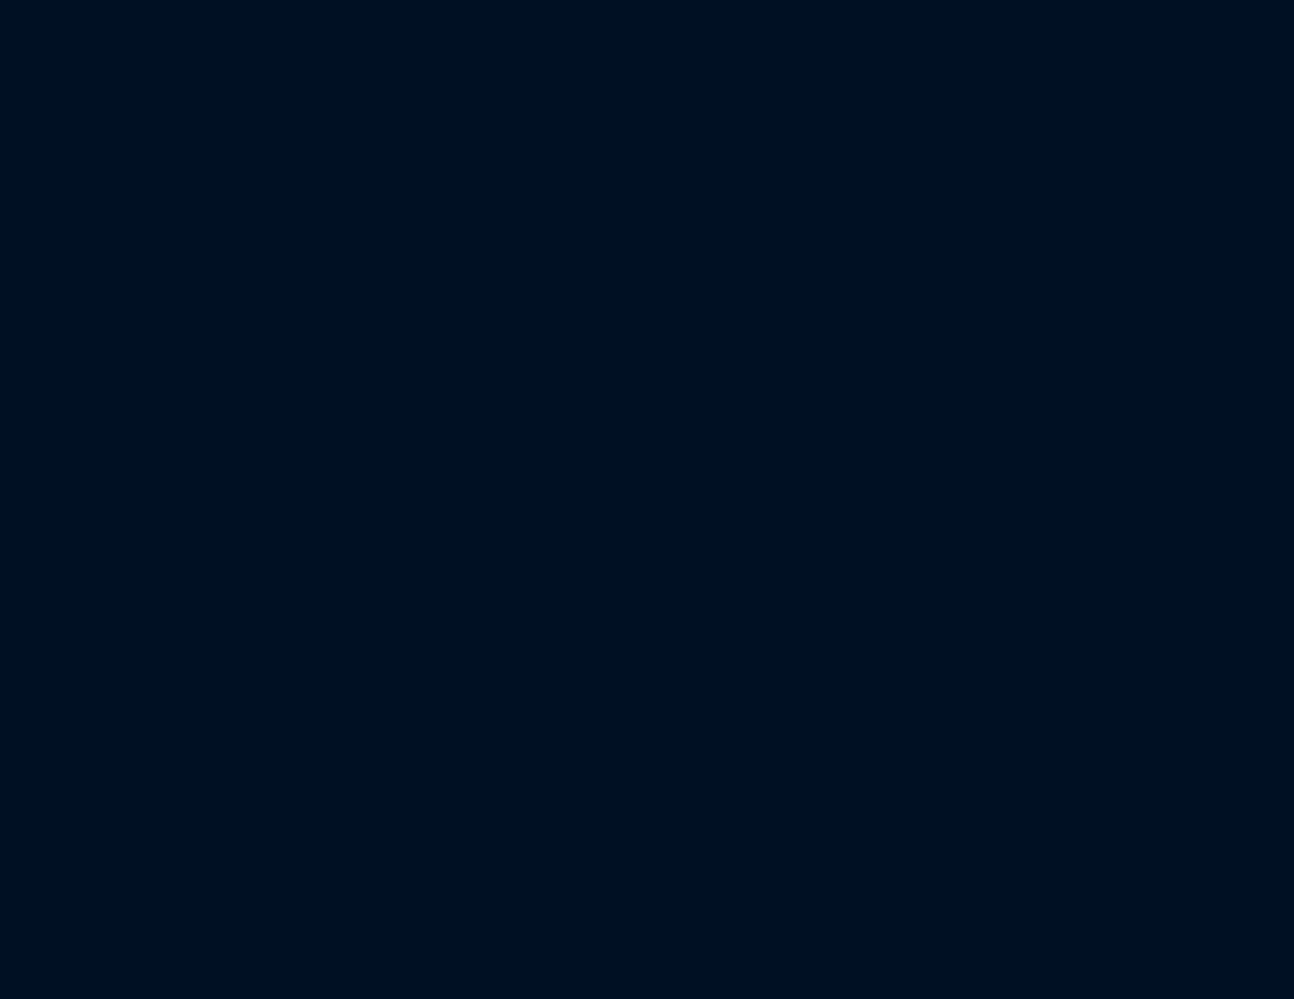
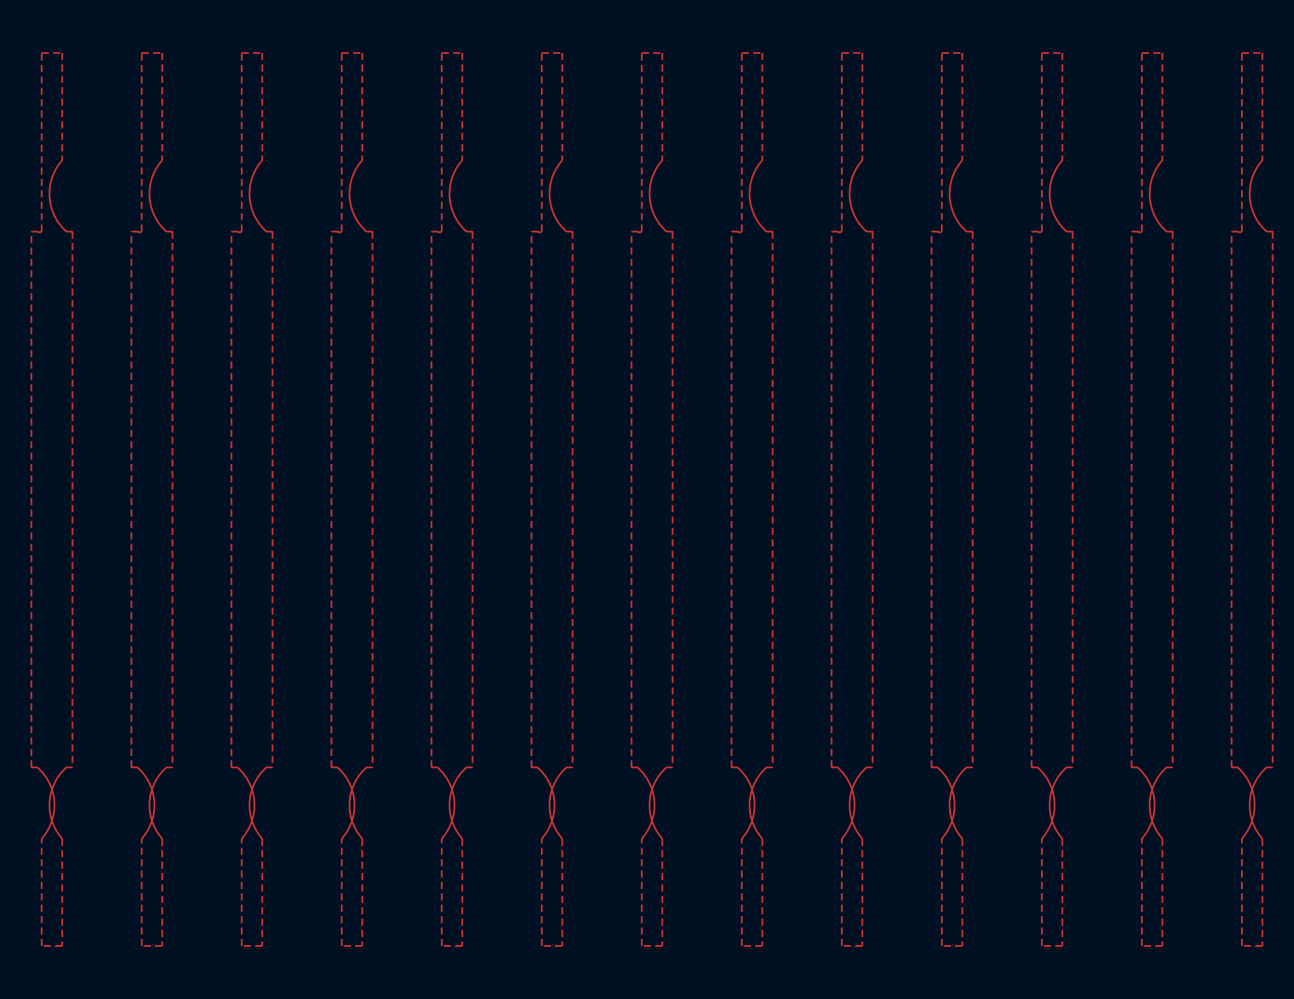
zone outline: none -> (41, 52) (62, 52) (62, 160) (52, 177) (49, 196) (51, 209) (57, 221) (66, 231) (72, 231) (72, 767) (66, 767) (57, 777) (51, 789) (50, 795) (49, 802) (50, 815) (52, 821) (62, 838) (62, 945) (41, 945) (41, 838) (51, 821) (53, 815) (54, 802) (53, 795) (51, 789) (46, 777) (37, 767) (31, 767) (31, 231) (41, 231) (41, 52)
zone outline: none -> (141, 52) (162, 52) (162, 160) (152, 177) (149, 196) (151, 209) (157, 221) (166, 231) (172, 231) (172, 767) (166, 767) (157, 777) (151, 789) (150, 795) (149, 802) (150, 815) (152, 821) (162, 838) (162, 945) (141, 945) (141, 838) (151, 821) (153, 815) (154, 802) (153, 795) (151, 789) (146, 777) (137, 767) (131, 767) (131, 231) (141, 231) (141, 52)
zone outline: none -> (241, 52) (262, 52) (262, 160) (252, 177) (249, 196) (251, 209) (257, 221) (266, 231) (272, 231) (272, 767) (266, 767) (257, 777) (251, 789) (250, 795) (249, 802) (250, 815) (252, 821) (262, 838) (262, 945) (241, 945) (241, 838) (251, 821) (253, 815) (254, 802) (253, 795) (251, 789) (246, 777) (237, 767) (231, 767) (231, 231) (241, 231) (241, 52)
zone outline: none -> (341, 52) (362, 52) (362, 160) (352, 177) (349, 196) (351, 209) (357, 221) (366, 231) (372, 231) (372, 767) (366, 767) (357, 777) (351, 789) (350, 795) (349, 802) (350, 815) (352, 821) (362, 838) (362, 945) (341, 945) (341, 838) (351, 821) (353, 815) (354, 802) (353, 795) (351, 789) (346, 777) (337, 767) (331, 767) (331, 231) (341, 231) (341, 52)
zone outline: none -> (441, 52) (462, 52) (462, 160) (452, 177) (449, 196) (452, 209) (457, 221) (466, 231) (472, 231) (472, 767) (466, 767) (457, 777) (452, 789) (450, 795) (449, 802) (450, 815) (452, 821) (462, 838) (462, 945) (441, 945) (441, 838) (451, 821) (453, 815) (454, 802) (453, 795) (452, 789) (446, 777) (437, 767) (431, 767) (431, 231) (441, 231) (441, 52)
zone outline: none -> (541, 52) (562, 52) (562, 160) (552, 177) (549, 196) (552, 209) (557, 221) (566, 231) (572, 231) (572, 767) (566, 767) (557, 777) (552, 789) (550, 795) (549, 802) (550, 815) (552, 821) (562, 838) (562, 945) (541, 945) (541, 838) (551, 821) (553, 815) (554, 802) (553, 795) (552, 789) (546, 777) (537, 767) (531, 767) (531, 231) (541, 231) (541, 52)
zone outline: none -> (641, 52) (662, 52) (662, 160) (652, 177) (649, 196) (652, 209) (657, 221) (666, 231) (672, 231) (672, 767) (666, 767) (657, 777) (652, 789) (650, 795) (649, 802) (650, 815) (652, 821) (662, 838) (662, 945) (641, 945) (641, 838) (651, 821) (653, 815) (654, 802) (653, 795) (652, 789) (646, 777) (637, 767) (631, 767) (631, 231) (641, 231) (641, 52)
zone outline: none -> (741, 52) (762, 52) (762, 160) (752, 177) (749, 196) (752, 209) (757, 221) (766, 231) (772, 231) (772, 767) (766, 767) (757, 777) (752, 789) (750, 795) (749, 802) (750, 815) (752, 821) (762, 838) (762, 945) (741, 945) (741, 838) (751, 821) (753, 815) (754, 802) (753, 795) (752, 789) (746, 777) (737, 767) (731, 767) (731, 231) (741, 231) (741, 52)
zone outline: none -> (841, 52) (862, 52) (862, 160) (852, 177) (849, 196) (852, 209) (857, 221) (866, 231) (872, 231) (872, 767) (866, 767) (857, 777) (852, 789) (850, 795) (849, 802) (850, 815) (852, 821) (862, 838) (862, 945) (841, 945) (841, 838) (851, 821) (853, 815) (854, 802) (853, 795) (852, 789) (846, 777) (837, 767) (831, 767) (831, 231) (841, 231) (841, 52)
zone outline: none -> (941, 52) (962, 52) (962, 160) (952, 177) (949, 196) (952, 209) (957, 221) (966, 231) (972, 231) (972, 767) (966, 767) (957, 777) (952, 789) (950, 795) (949, 802) (950, 815) (952, 821) (962, 838) (962, 945) (941, 945) (941, 838) (951, 821) (953, 815) (954, 802) (953, 795) (952, 789) (946, 777) (937, 767) (931, 767) (931, 231) (941, 231) (941, 52)
zone outline: none -> (1041, 52) (1062, 52) (1062, 160) (1052, 177) (1049, 196) (1052, 209) (1057, 221) (1066, 231) (1072, 231) (1072, 767) (1066, 767) (1057, 777) (1052, 789) (1050, 795) (1049, 802) (1050, 815) (1052, 821) (1062, 838) (1062, 945) (1041, 945) (1041, 838) (1051, 821) (1053, 815) (1054, 802) (1053, 795) (1052, 789) (1046, 777) (1037, 767) (1031, 767) (1031, 231) (1041, 231) (1041, 52)
zone outline: none -> (1141, 52) (1162, 52) (1162, 160) (1152, 177) (1149, 196) (1152, 209) (1157, 221) (1166, 231) (1172, 231) (1172, 767) (1166, 767) (1157, 777) (1152, 789) (1150, 795) (1149, 802) (1150, 815) (1152, 821) (1162, 838) (1162, 945) (1141, 945) (1141, 838) (1151, 821) (1153, 815) (1154, 802) (1153, 795) (1152, 789) (1146, 777) (1137, 767) (1131, 767) (1131, 231) (1141, 231) (1141, 52)
zone outline: none -> (1241, 52) (1262, 52) (1262, 160) (1252, 177) (1249, 196) (1252, 209) (1257, 221) (1266, 231) (1272, 231) (1272, 767) (1266, 767) (1257, 777) (1252, 789) (1250, 795) (1249, 802) (1250, 815) (1252, 821) (1262, 838) (1262, 945) (1241, 945) (1241, 838) (1251, 821) (1253, 815) (1254, 802) (1253, 795) (1252, 789) (1246, 777) (1237, 767) (1231, 767) (1231, 231) (1241, 231) (1241, 52)

